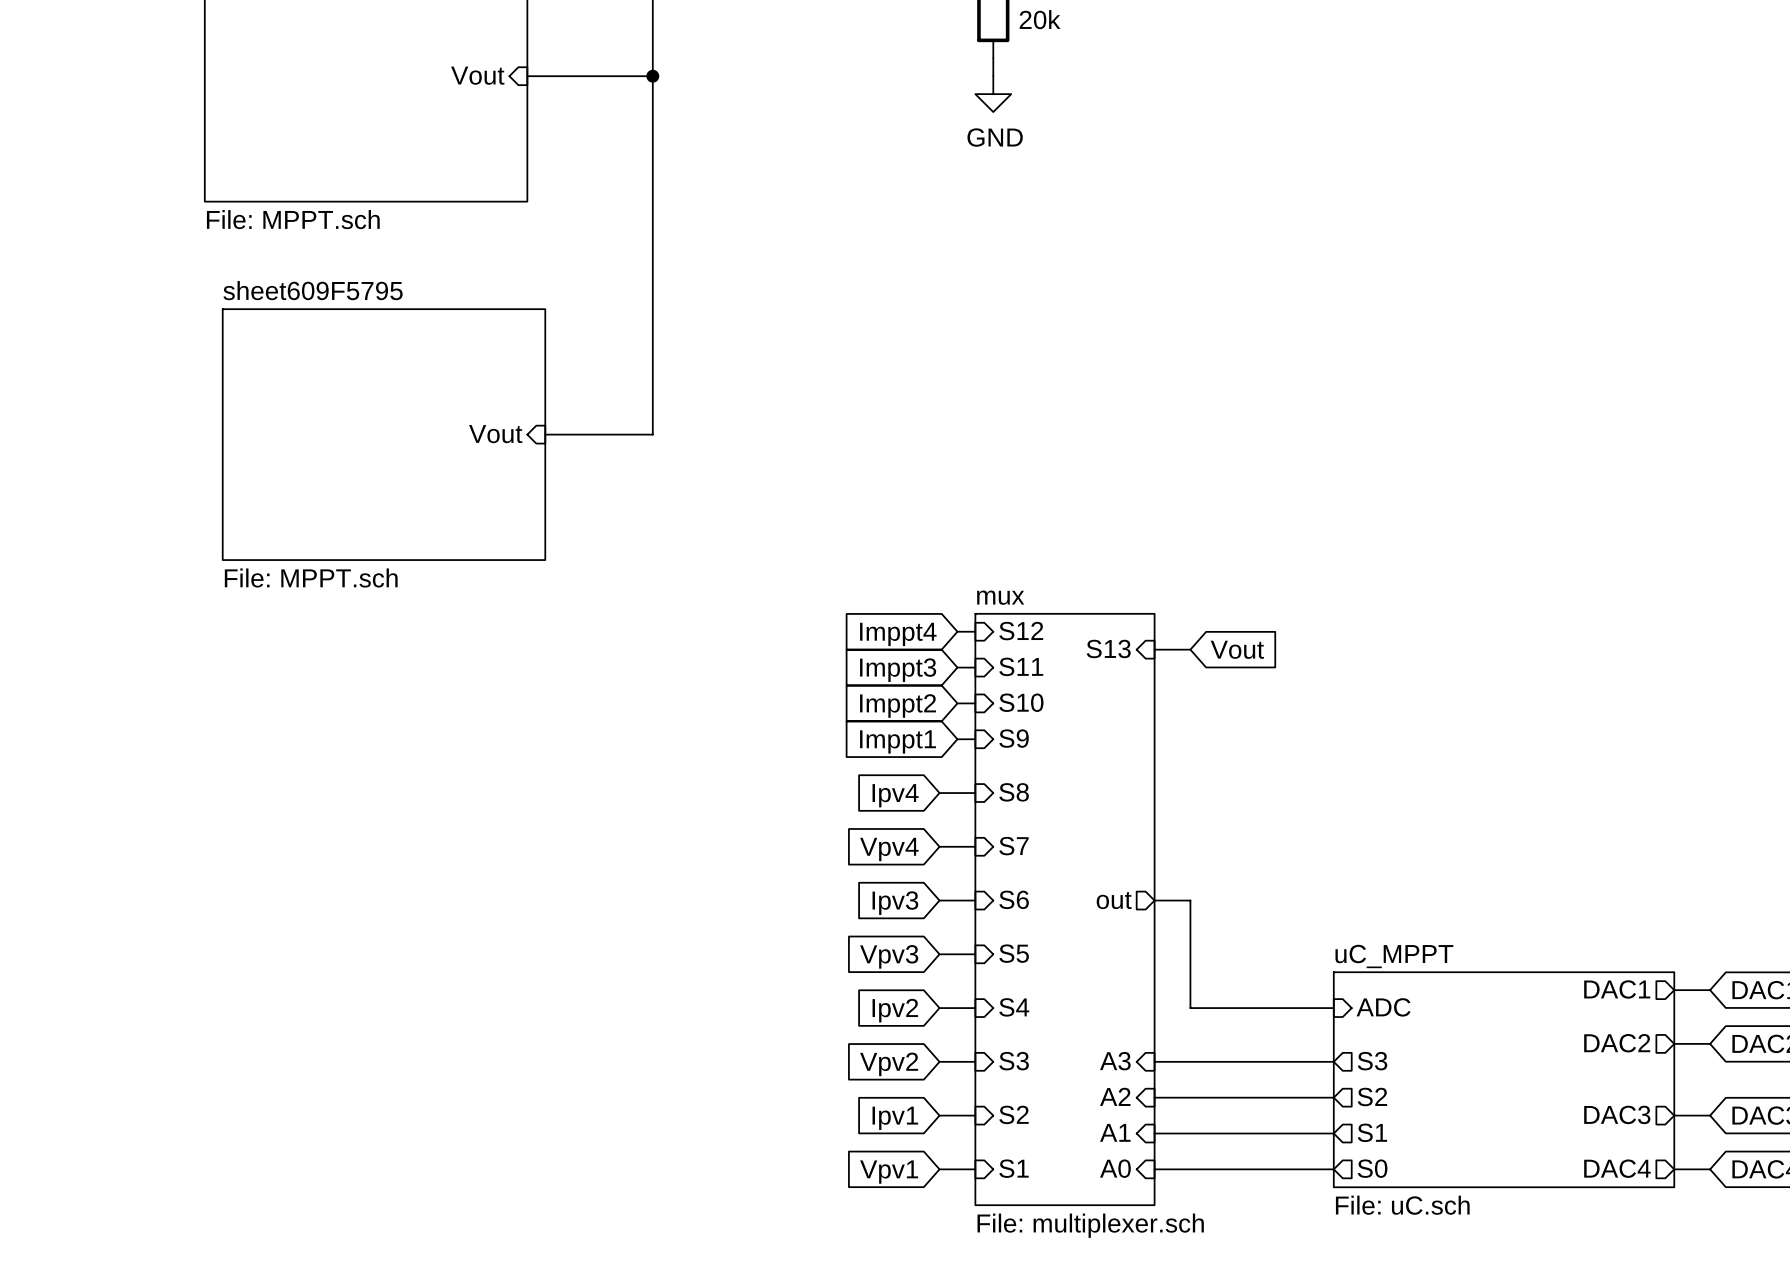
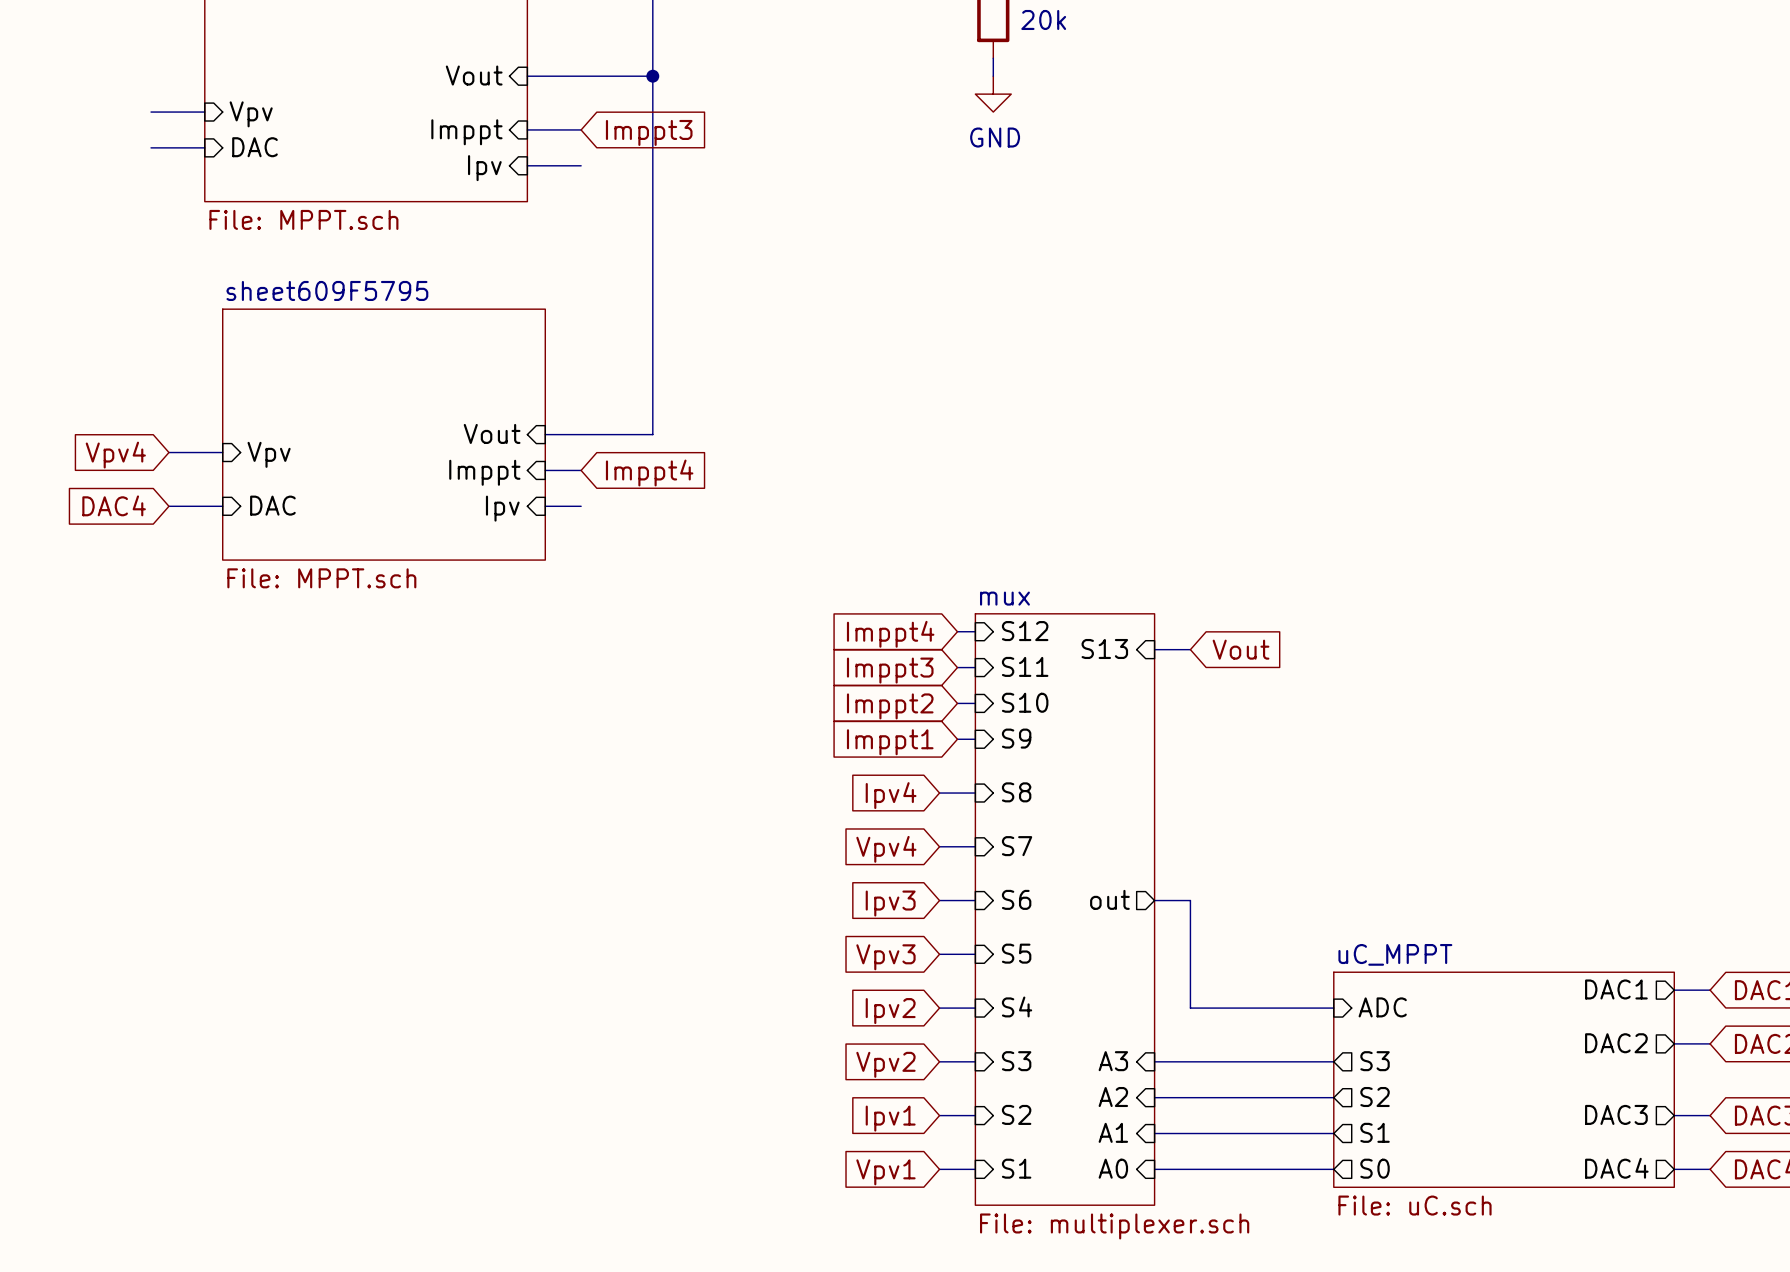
wire: none -> (151, 112) (204, 112)
sheet pin: none -> Vpv (251, 114)
wire: none -> (527, 129) (581, 129)
sheet pin: none -> Imppt (466, 132)
global label: none -> Imppt3 (649, 132)
wire: none -> (151, 147) (204, 147)
sheet pin: none -> DAC (255, 147)
wire: none -> (527, 165) (581, 165)
sheet pin: none -> Ipv (484, 168)
wire: none -> (168, 452) (222, 452)
sheet pin: none -> Vpv (269, 454)
global label: none -> Vpv4 (115, 455)
wire: none -> (545, 470) (581, 470)
sheet pin: none -> Imppt (484, 472)
global label: none -> Imppt4 (649, 473)
sheet pin: none -> DAC (272, 505)
global label: none -> DAC4 (114, 505)
wire: none -> (168, 506) (222, 506)
wire: none -> (545, 506) (581, 506)
sheet pin: none -> Ipv (502, 508)

